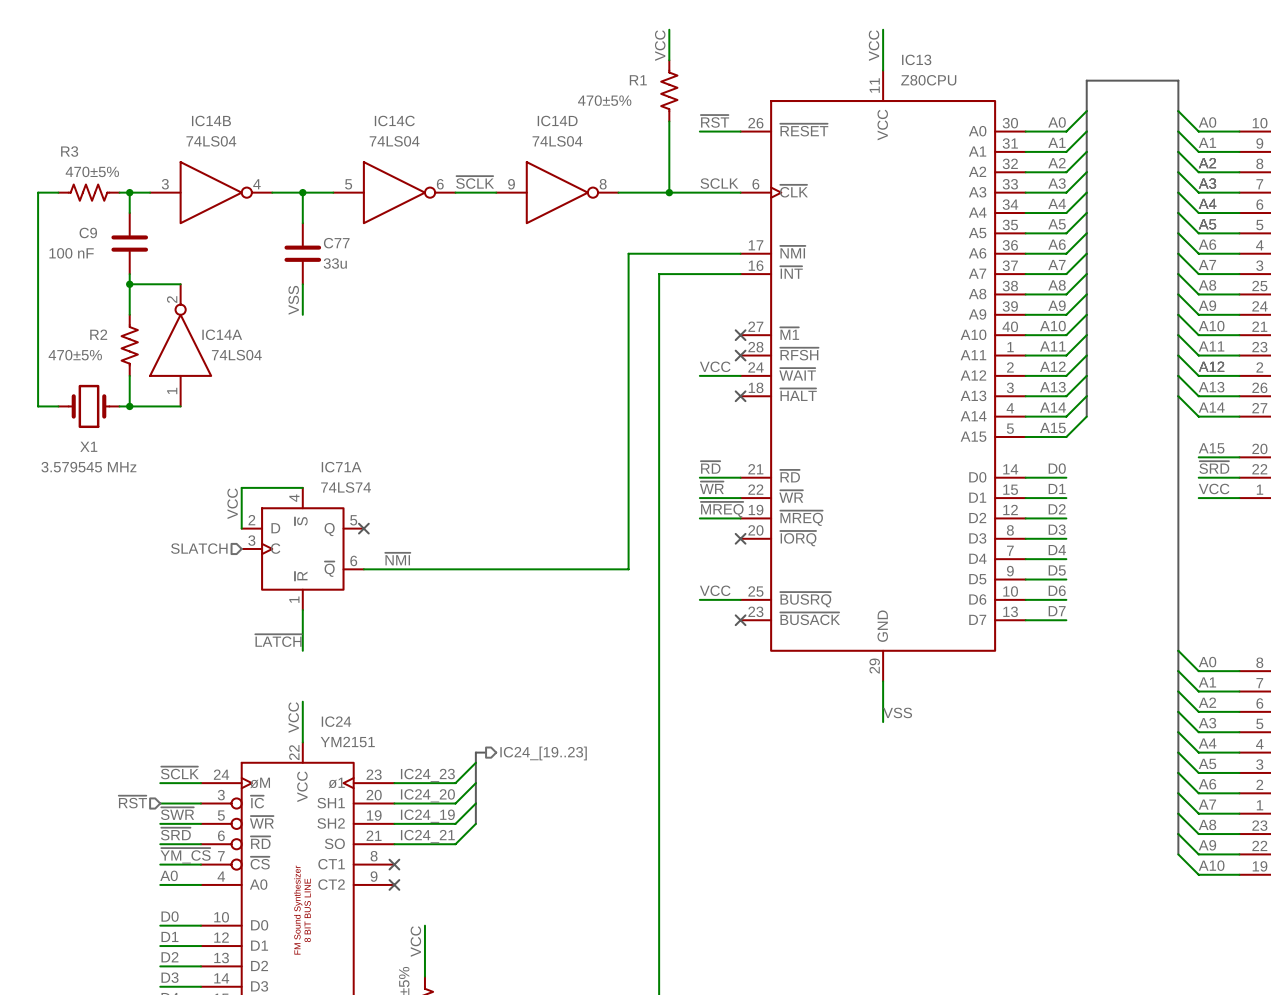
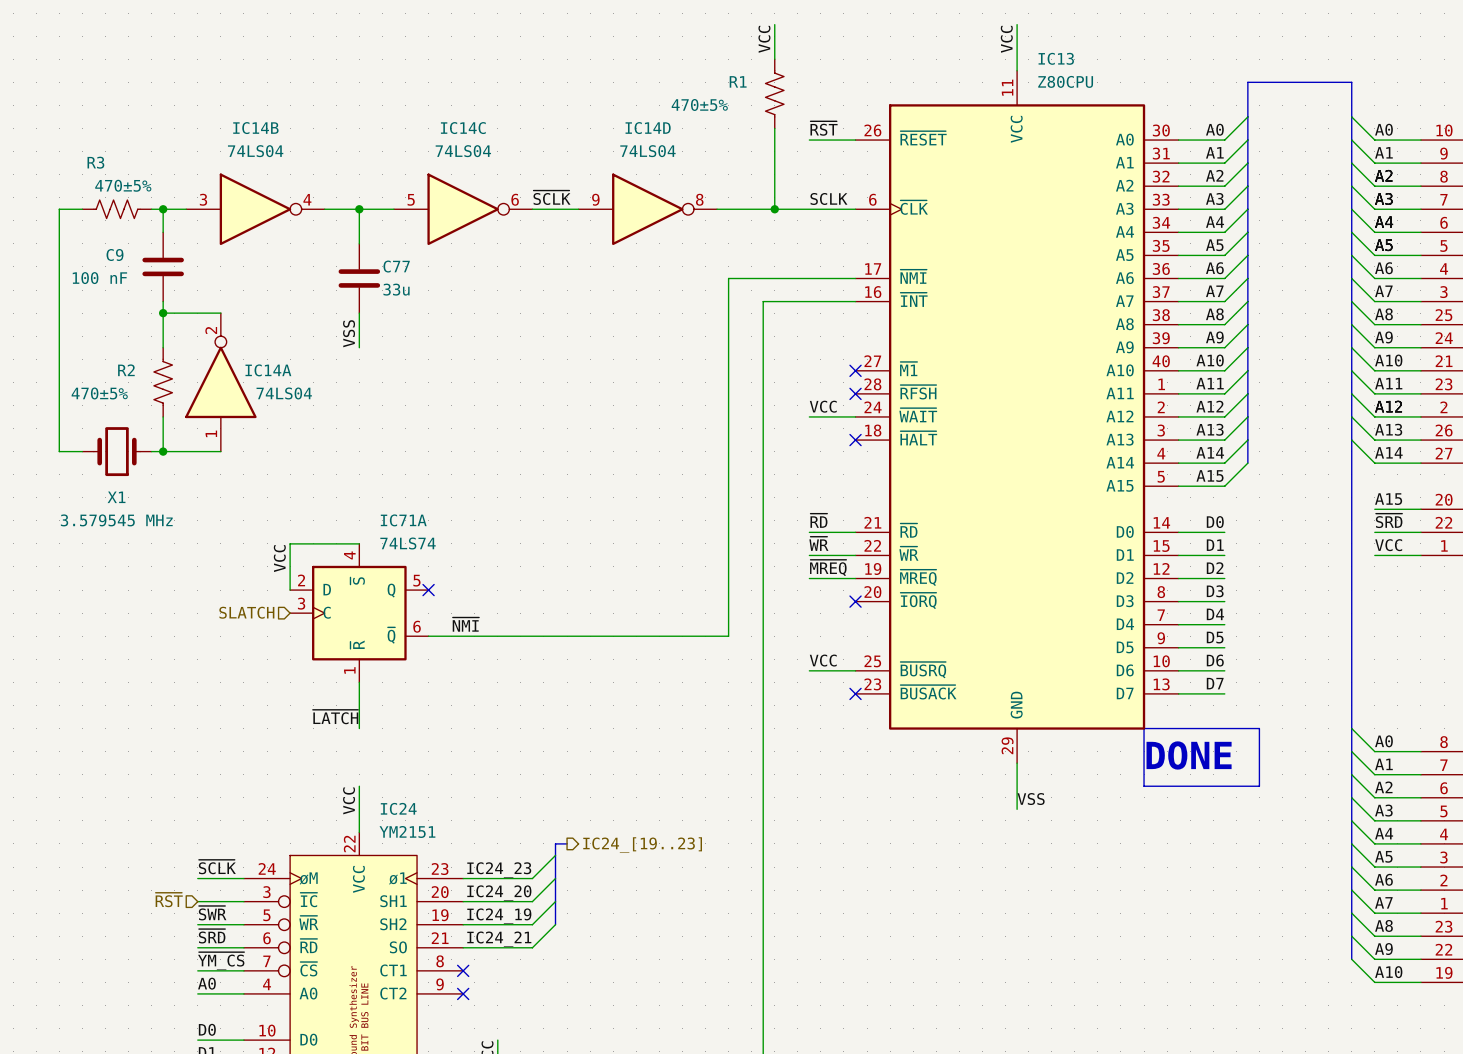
line: none -> (1144, 728) (1259, 728) (1259, 786) (1144, 786) (1144, 728)
text: none -> DONE (1189, 755)

